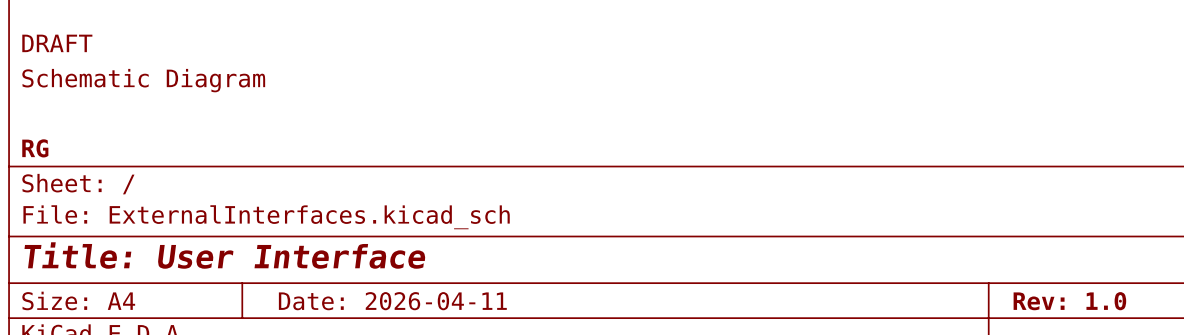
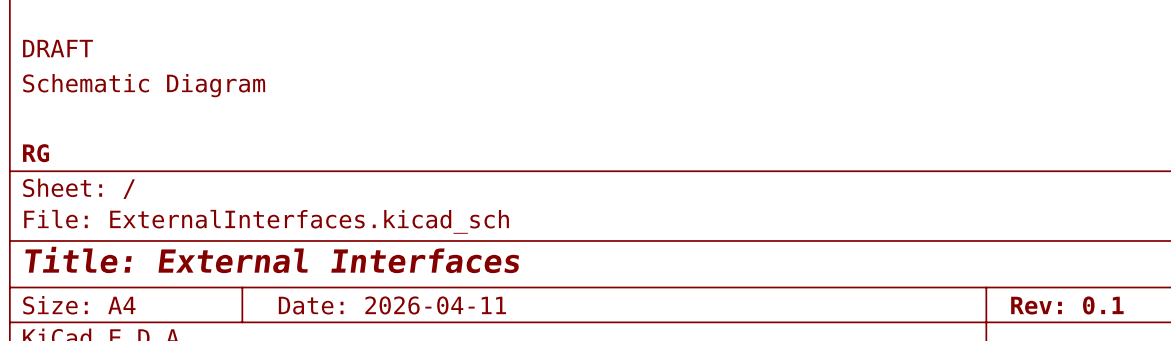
title block: Title: User Interface (225, 255) -> Title: External Interfaces (272, 259)
title block: Rev: 1.0 (1069, 301) -> Rev: 0.1 (1067, 305)

